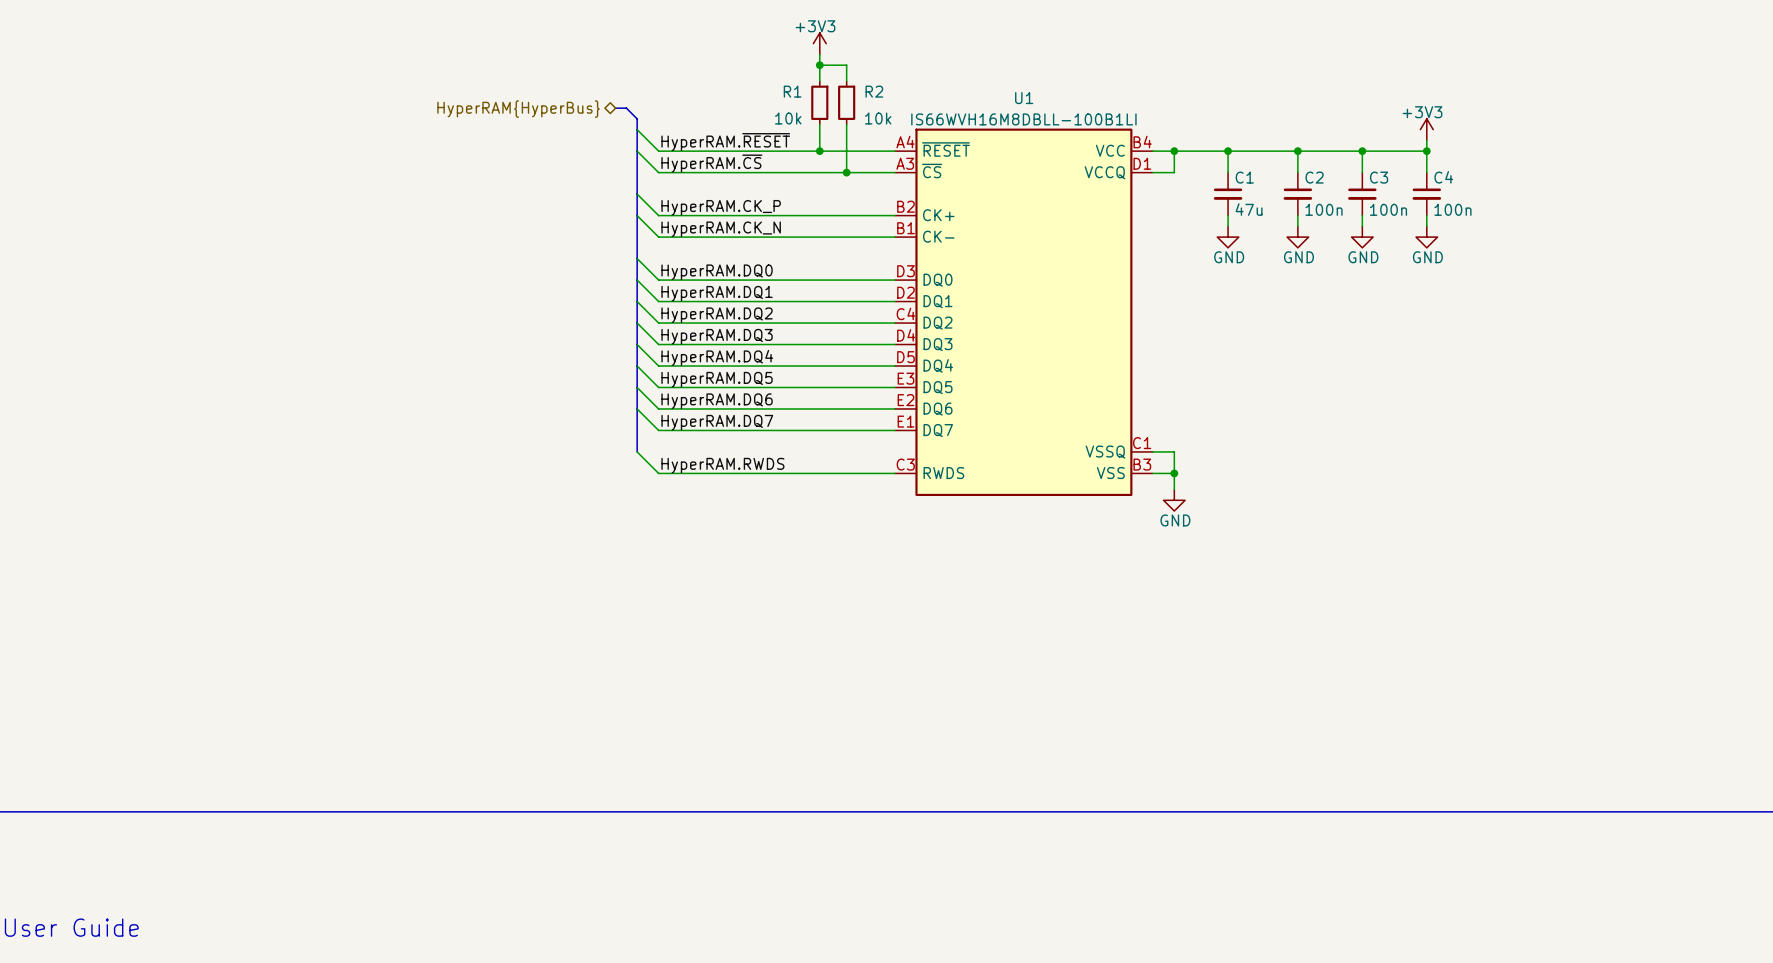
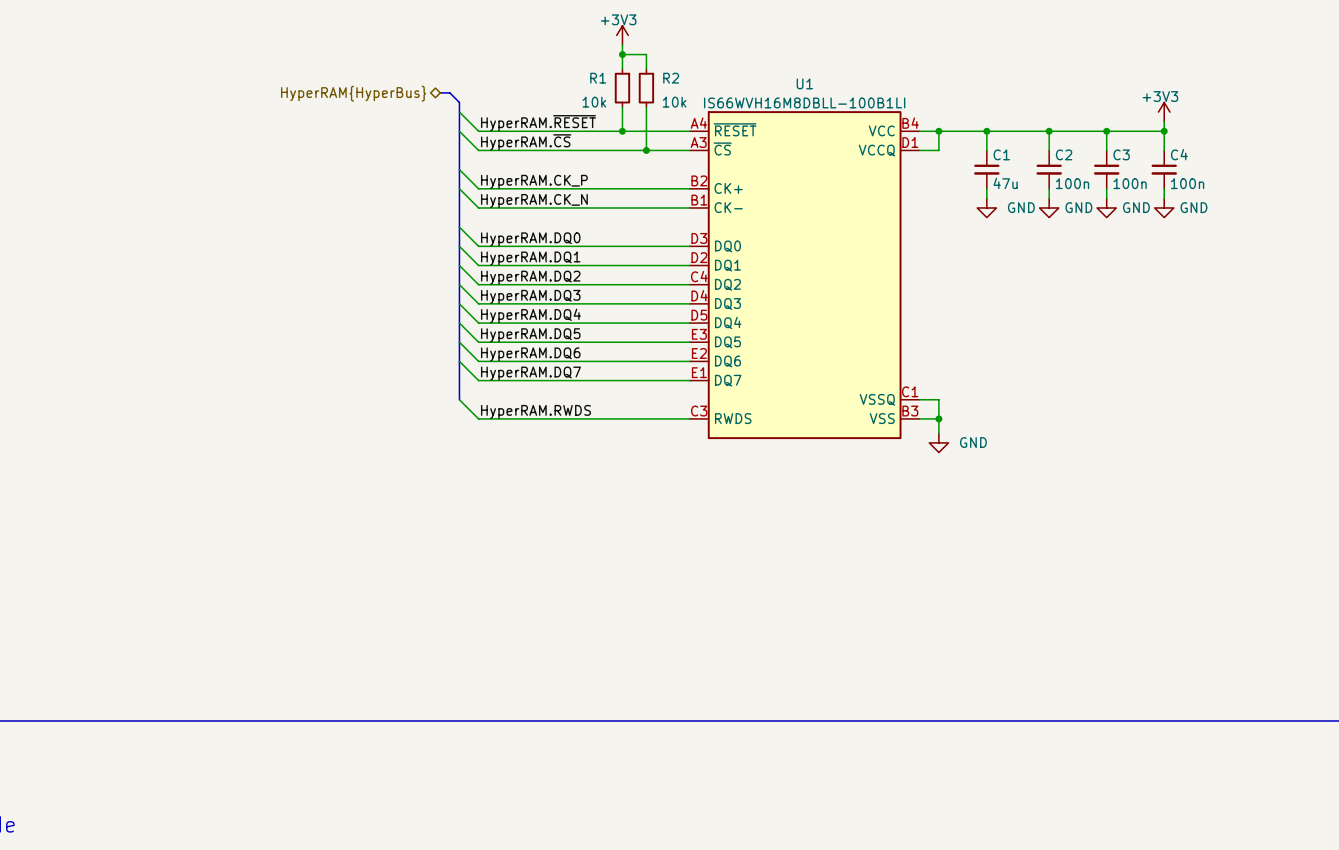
power symbol text position: GND (1229, 257) -> GND (1021, 207)
power symbol text position: GND (1298, 257) -> GND (1078, 207)
power symbol text position: GND (1363, 257) -> GND (1136, 207)
power symbol text position: GND (1427, 257) -> GND (1193, 207)
power symbol text position: GND (1175, 520) -> GND (973, 442)

